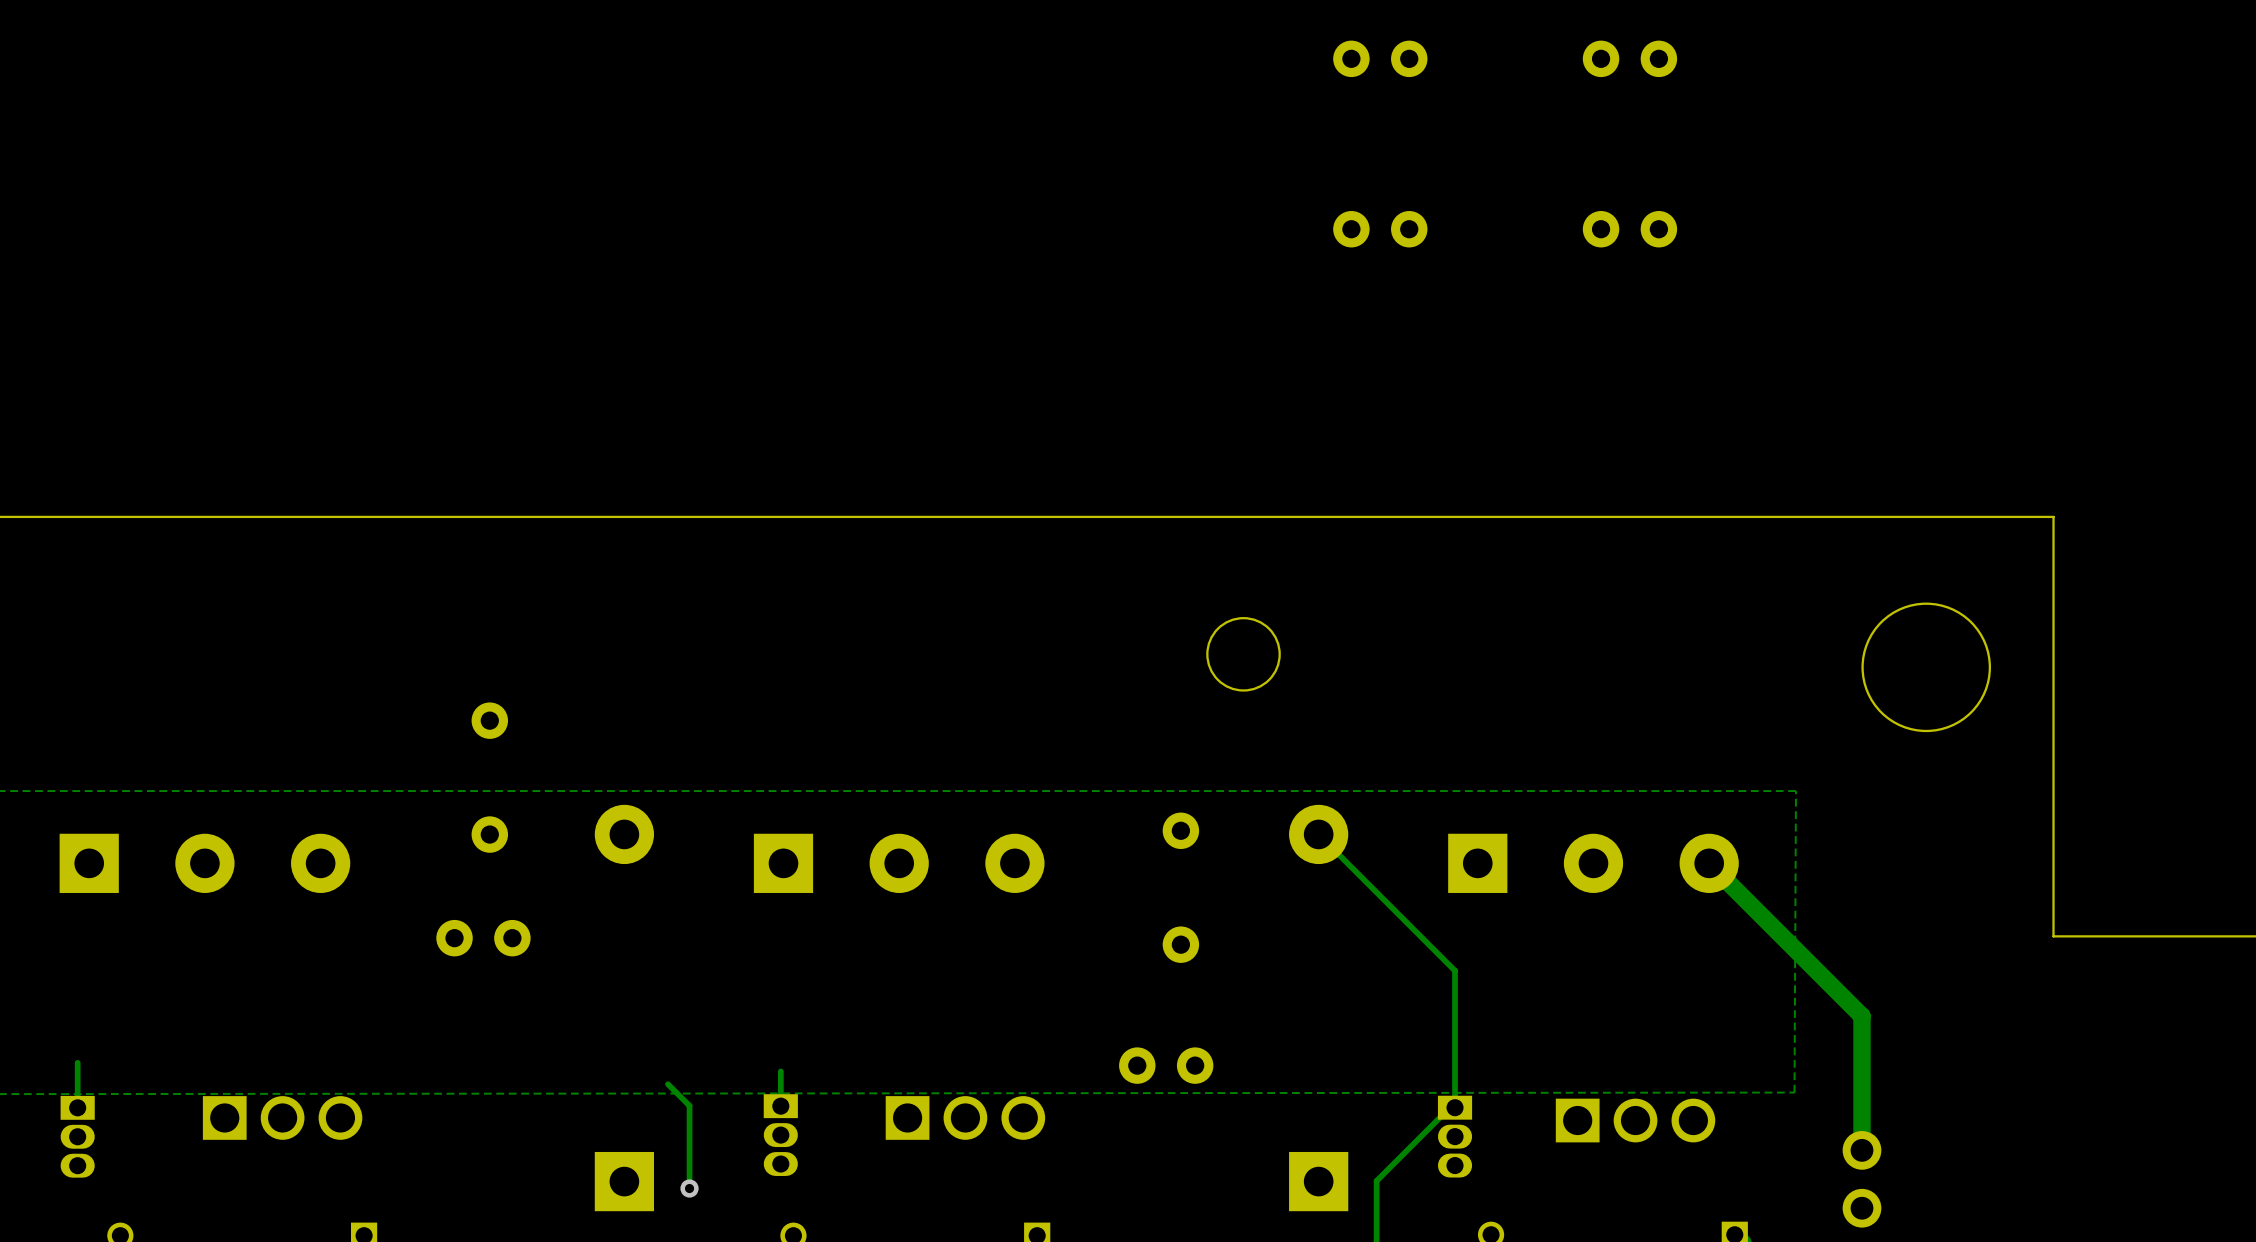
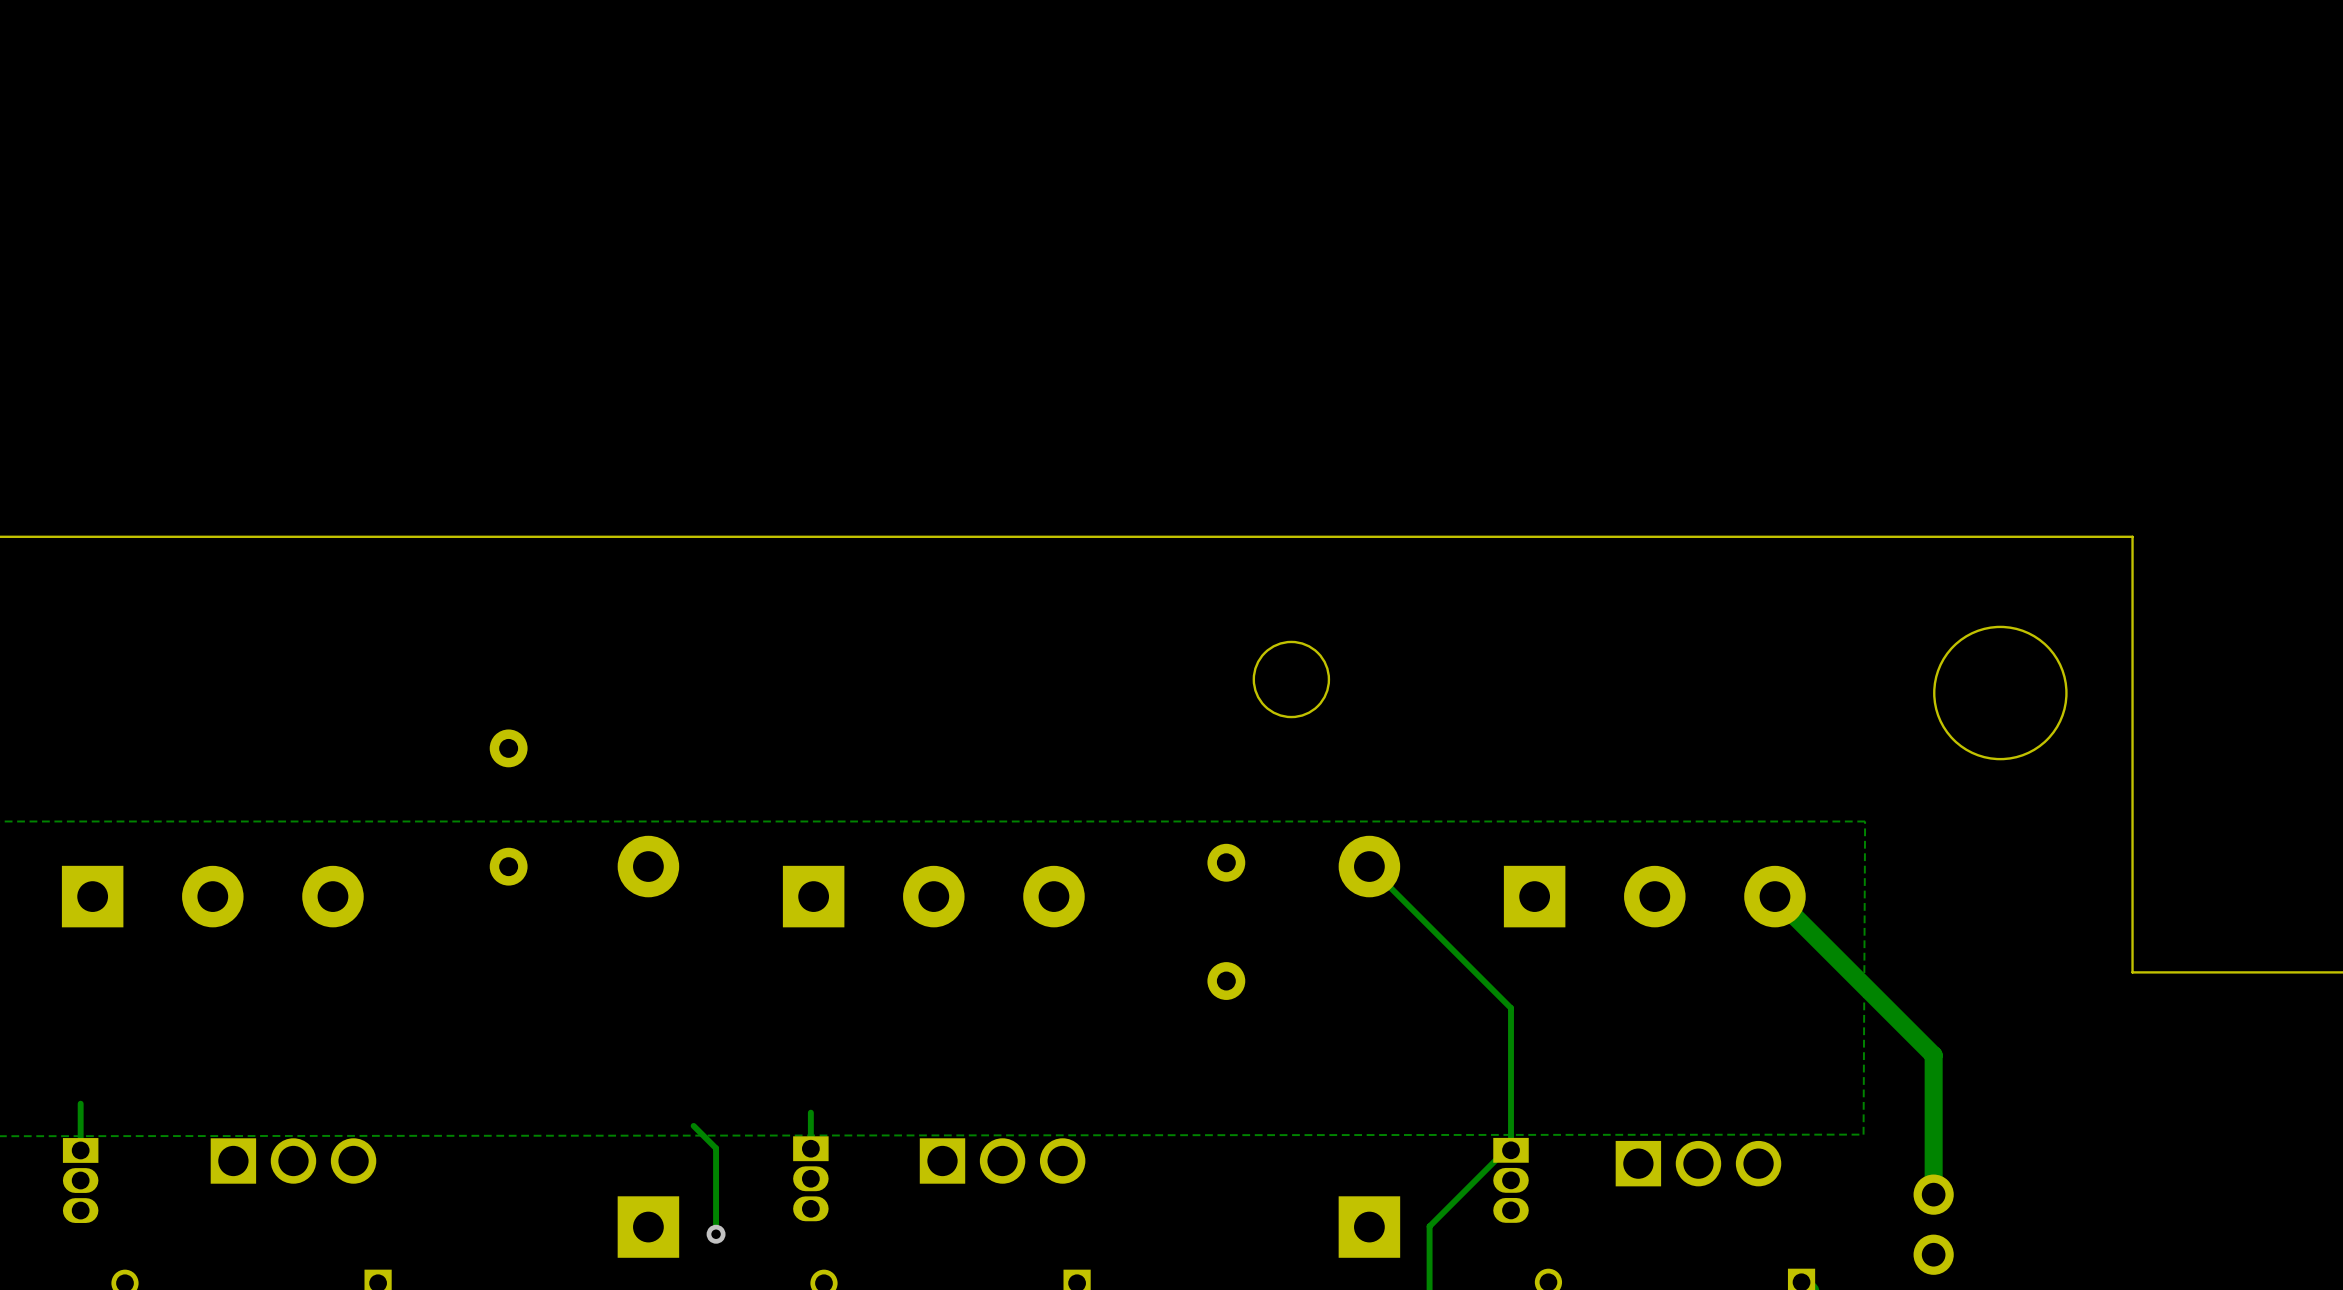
part: (1380, 58) -> none
part: (1629, 58) -> none
part: (1380, 229) -> none
part: (1629, 229) -> none
part: (483, 938) -> none
part: (1166, 1065) -> none

